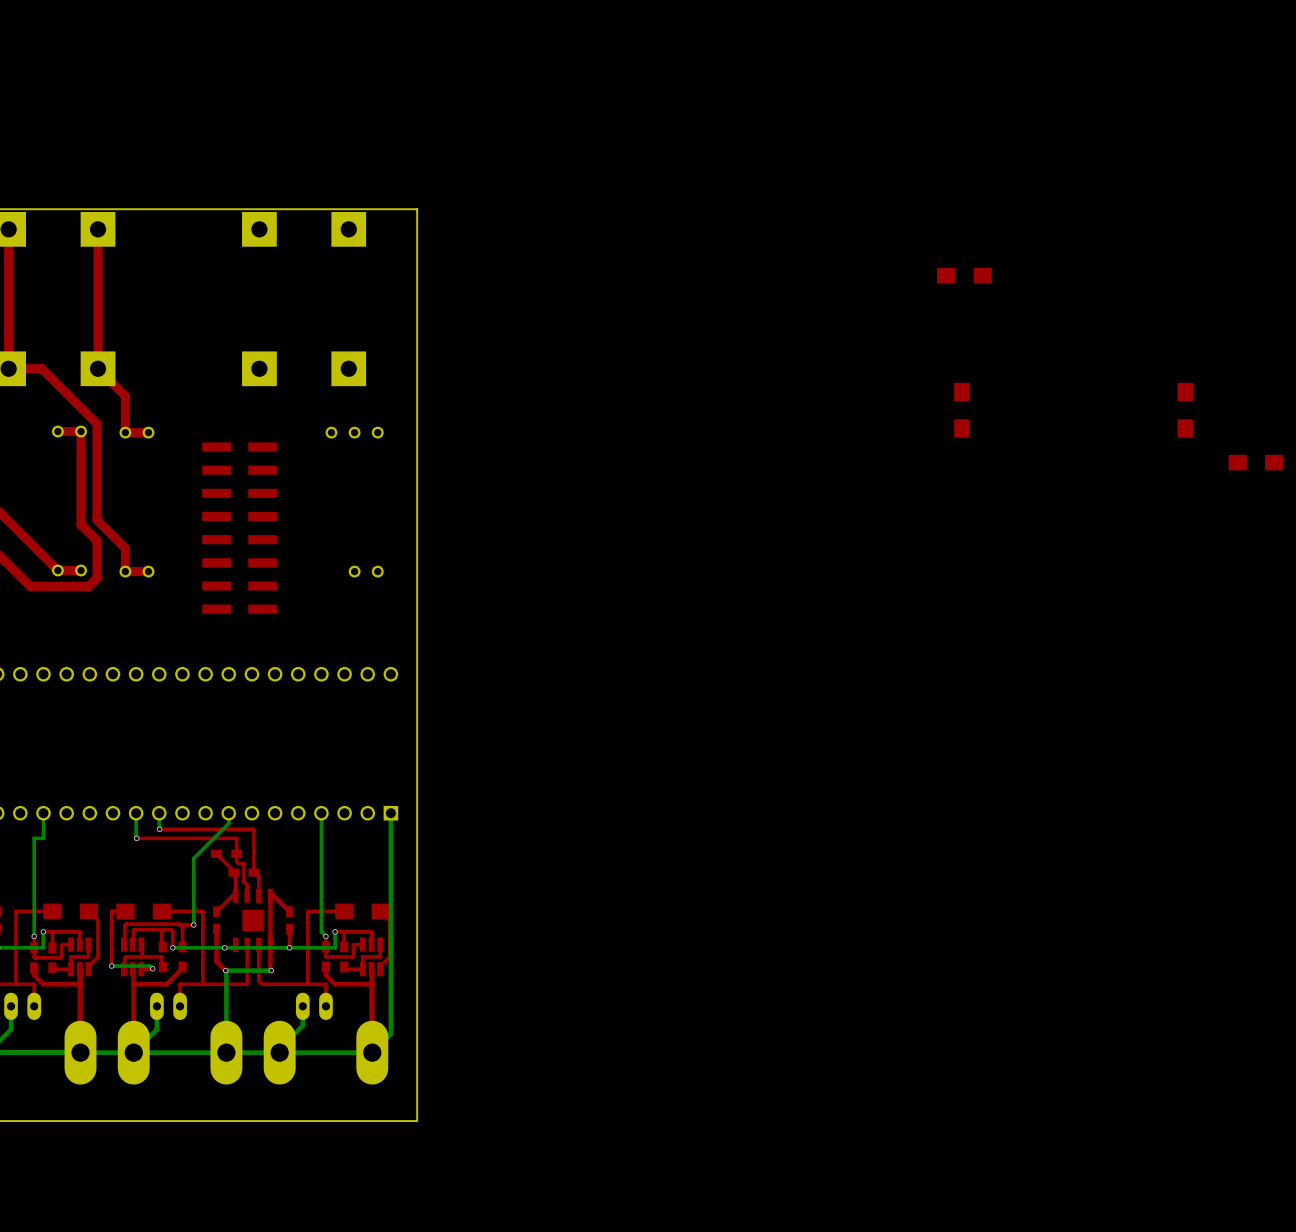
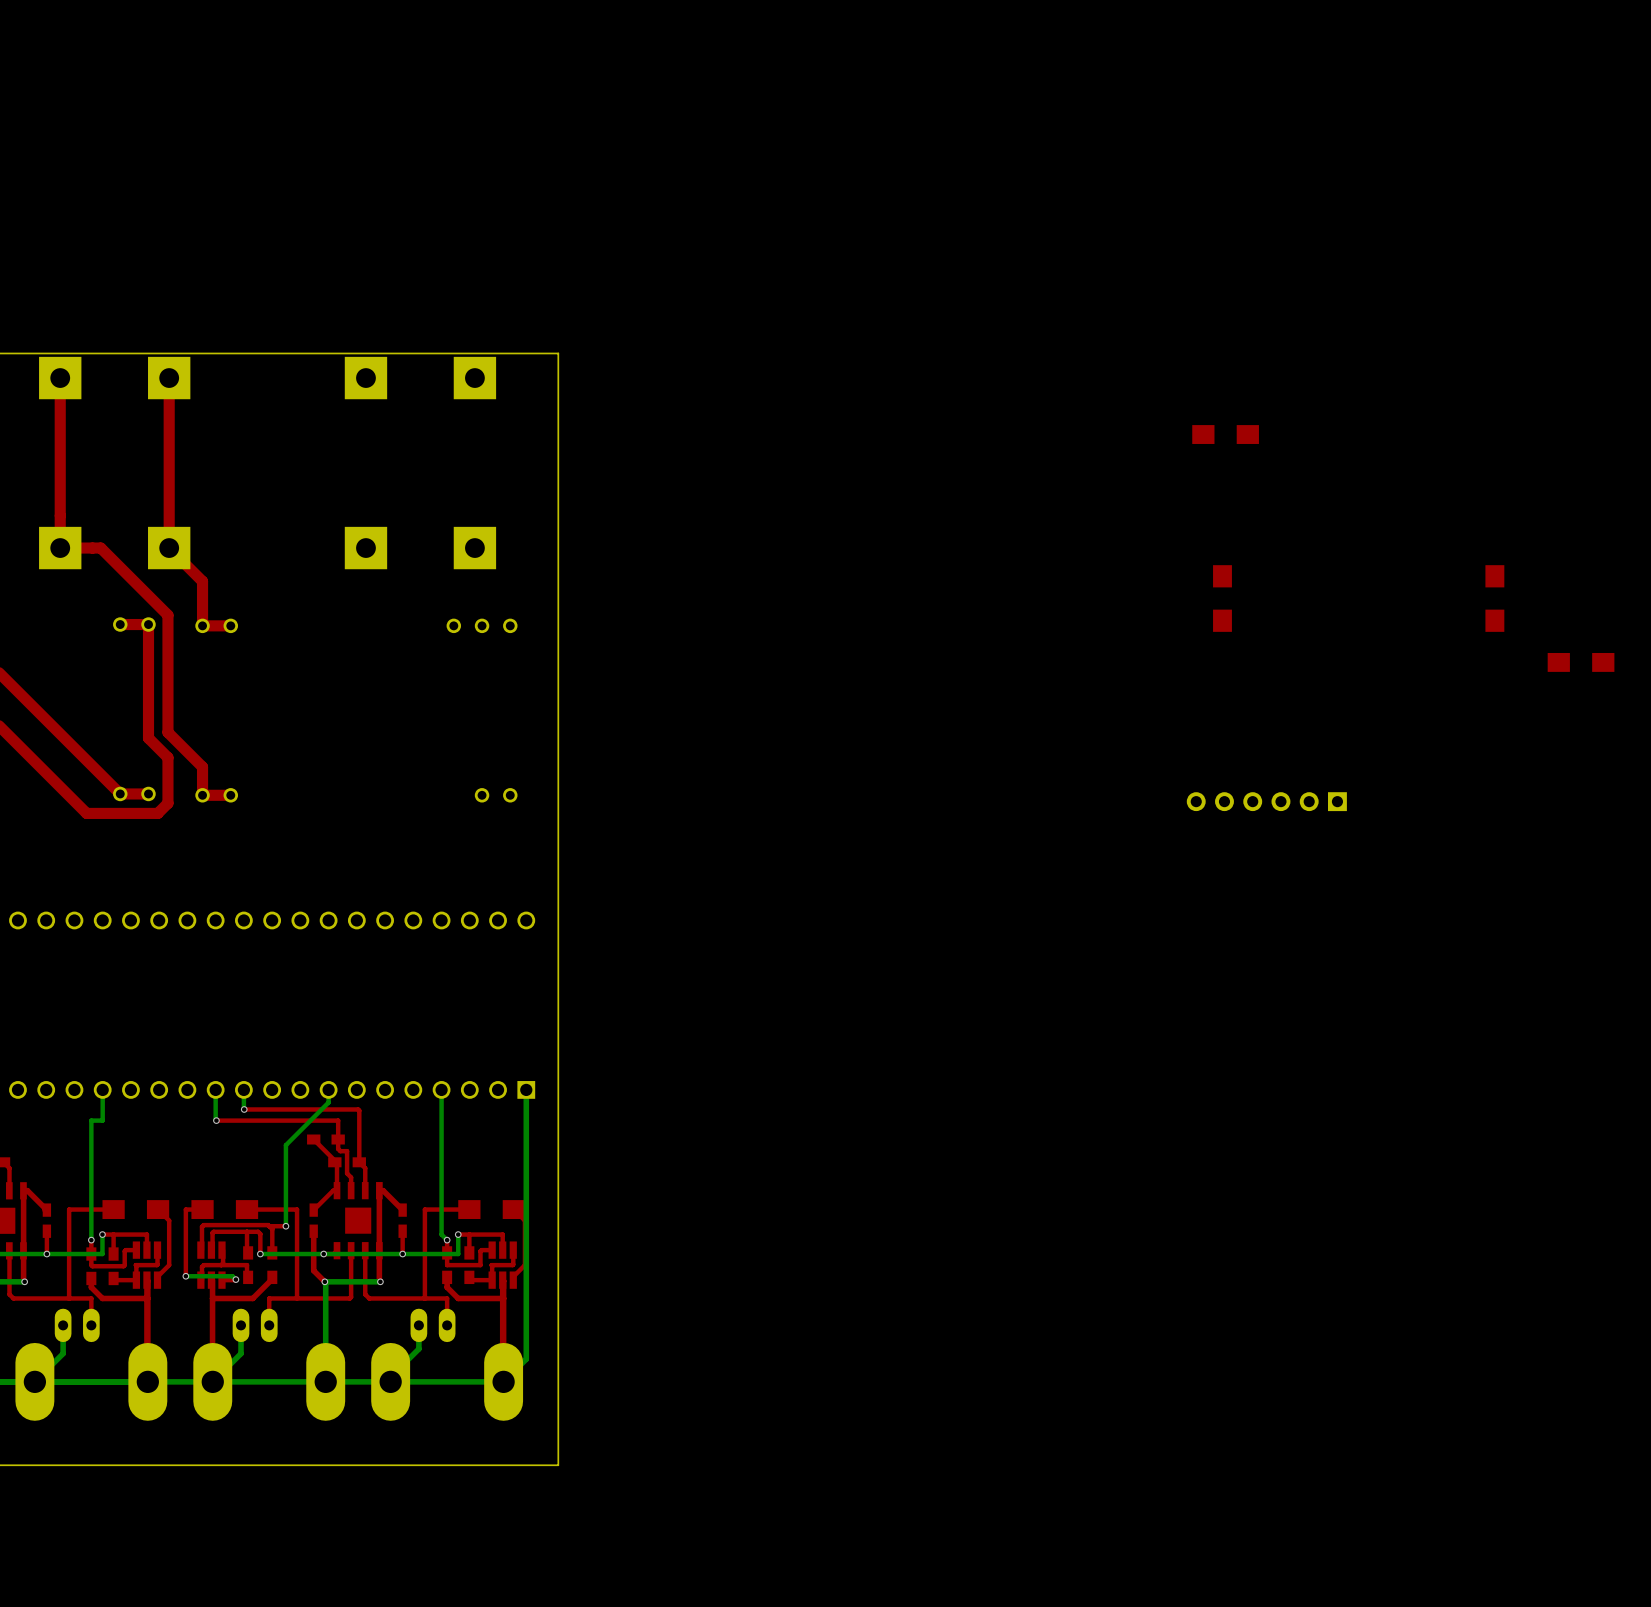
part: (239, 528) -> none
part: none -> (1266, 801)

